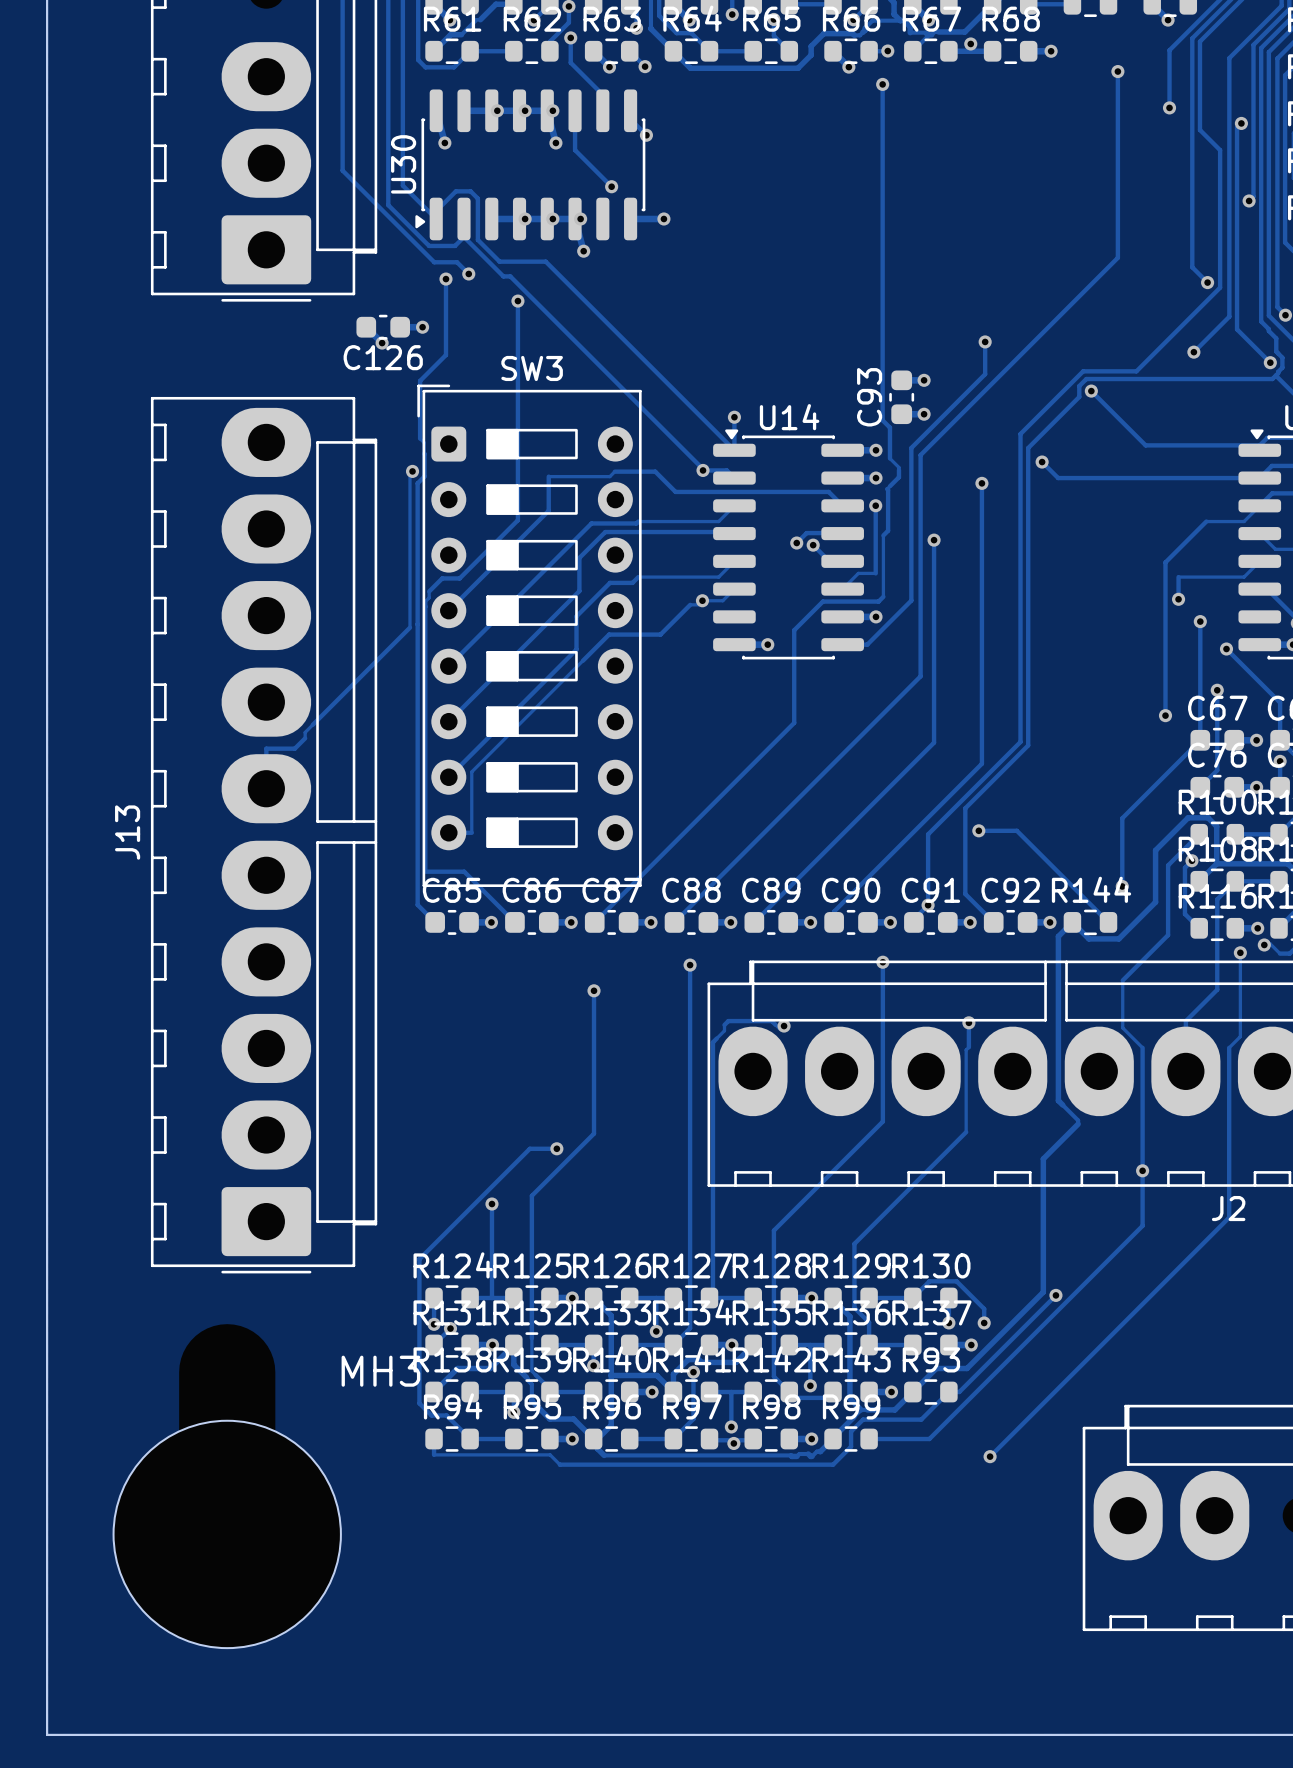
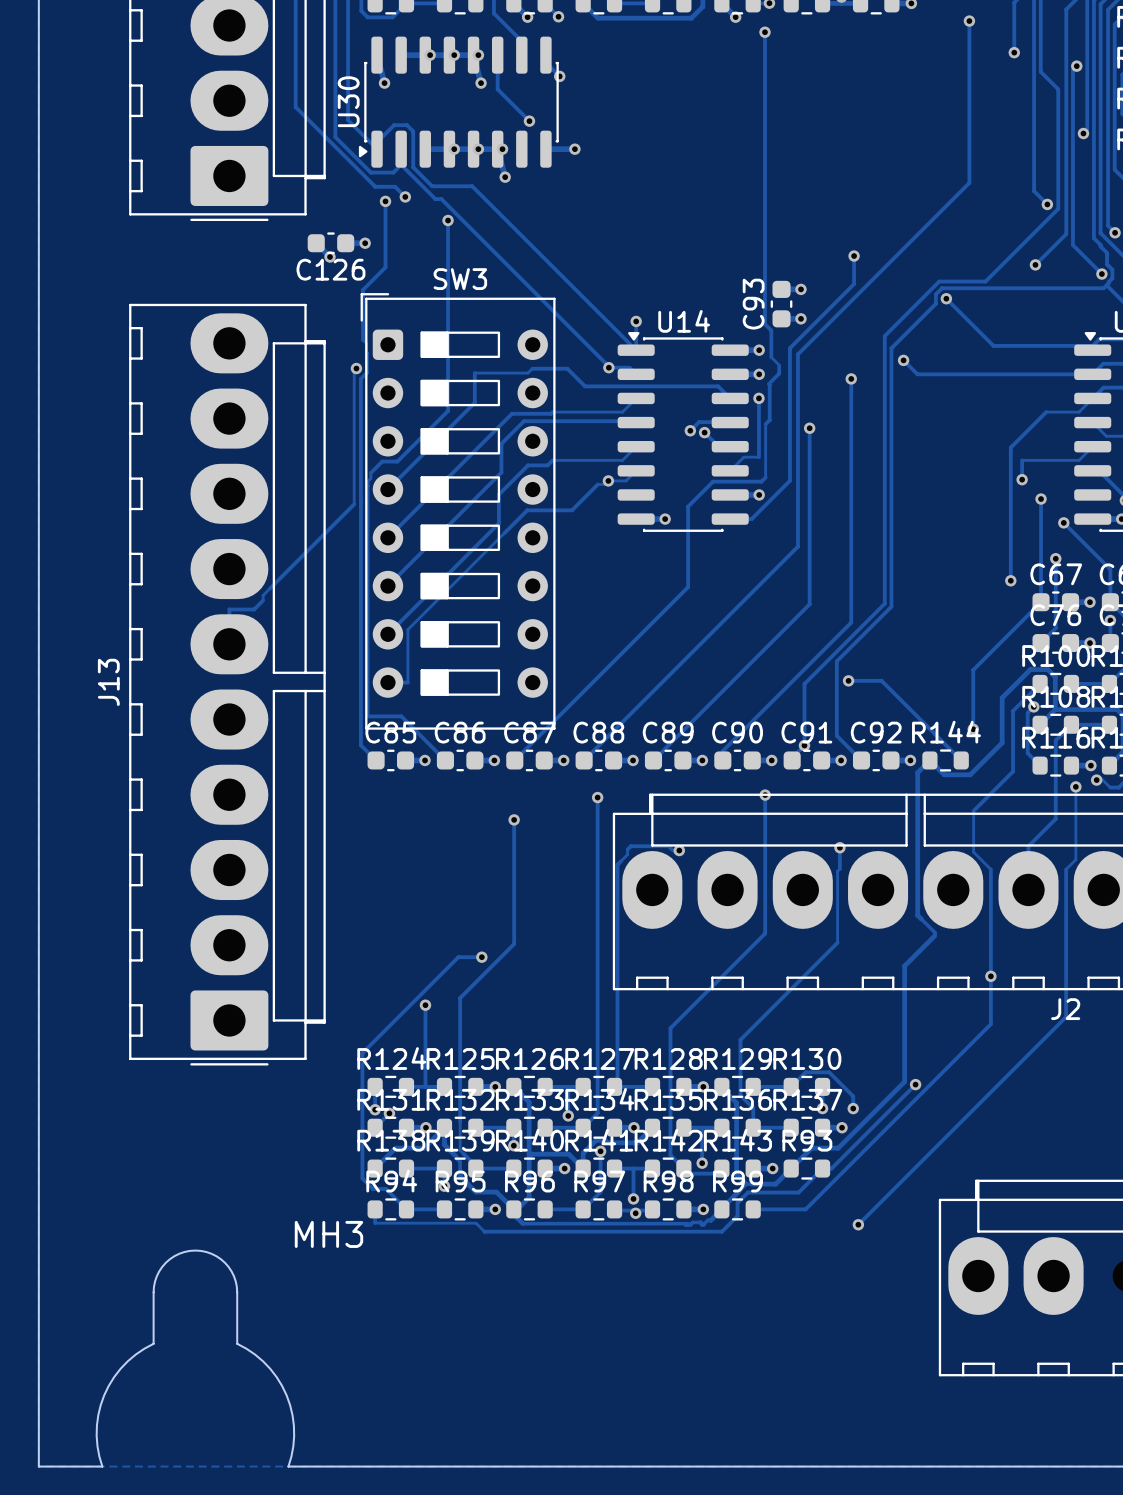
MH3 footprint: [113, 1324, 341, 1649] -> [294, 1220, 364, 1248]
MH3 name position: MH3 (380, 1371) -> MH3 (328, 1234)
board edge: (120, 1734) (334, 1734) -> (102, 1466) (96, 1435) (98, 1415) (104, 1395) (120, 1368) (135, 1354) (153, 1343) (153, 1286) (159, 1271) (174, 1256) (195, 1250) (216, 1256) (231, 1271) (236, 1286) (237, 1343) (263, 1361) (276, 1377) (286, 1395) (293, 1425) (293, 1446) (288, 1466)

